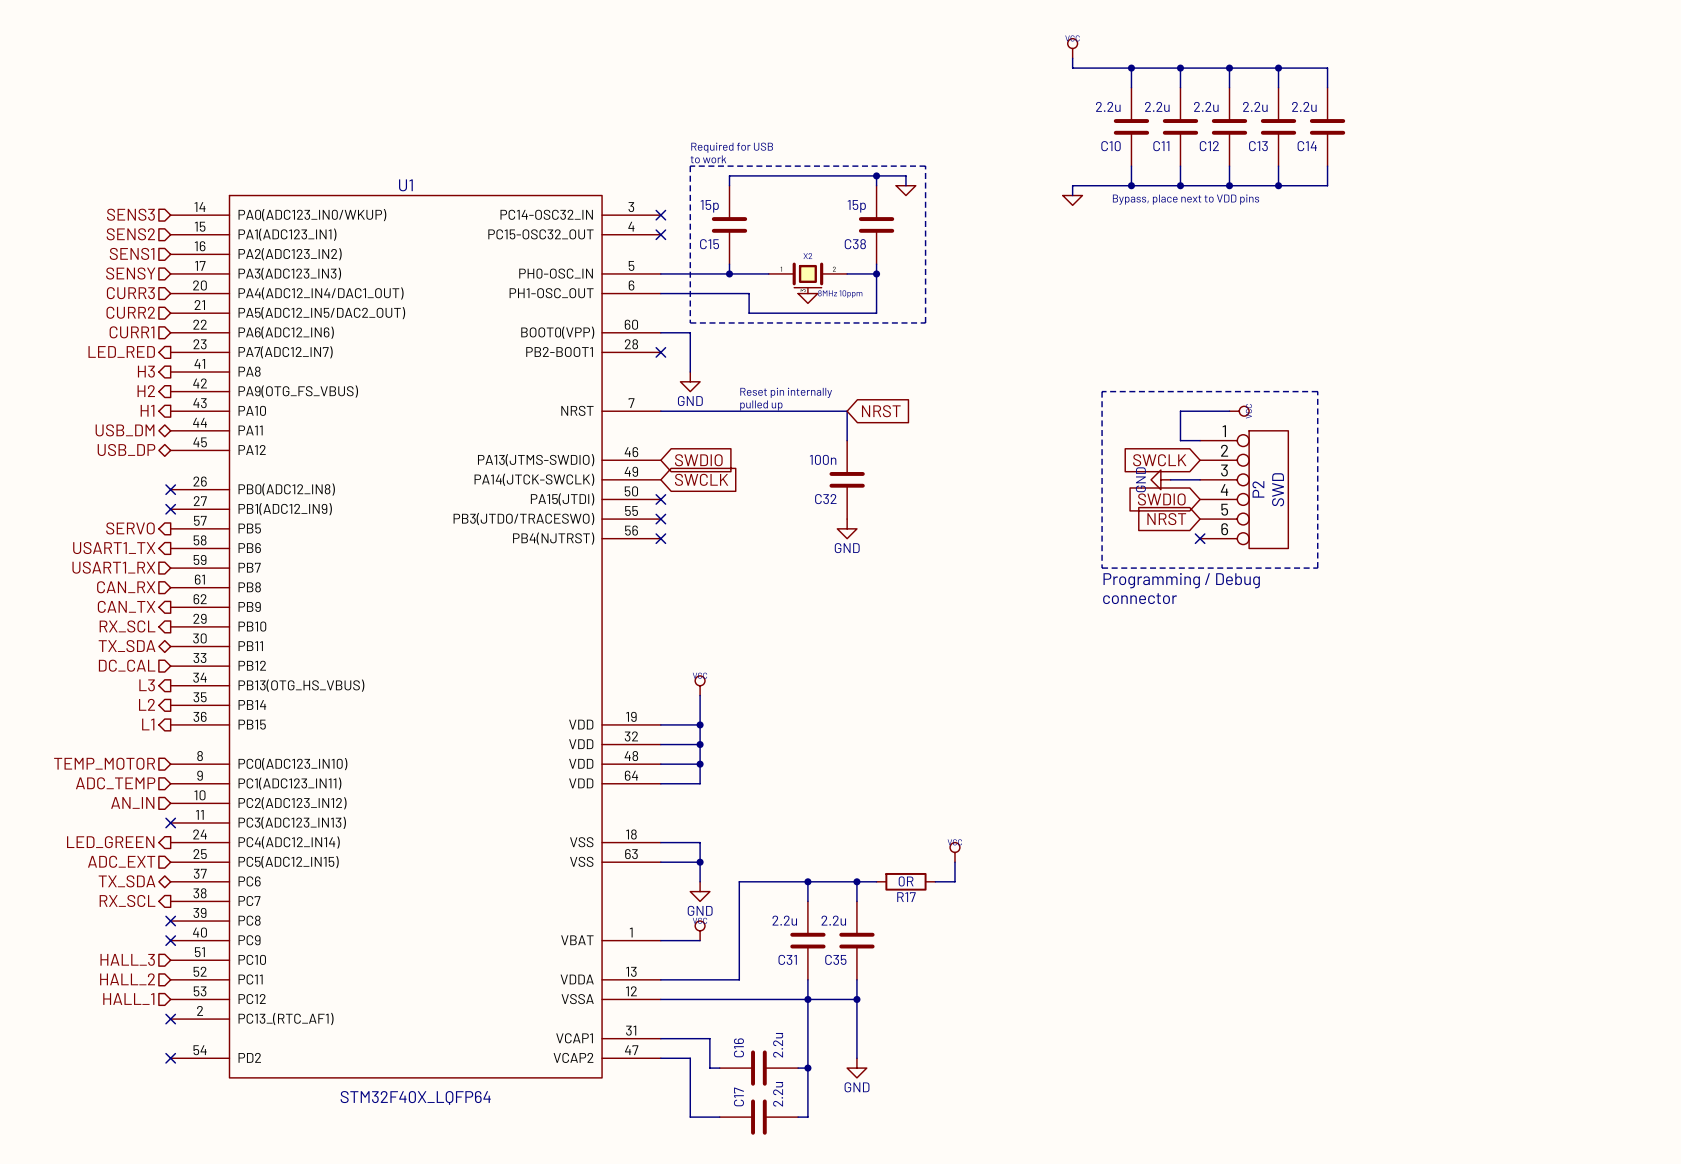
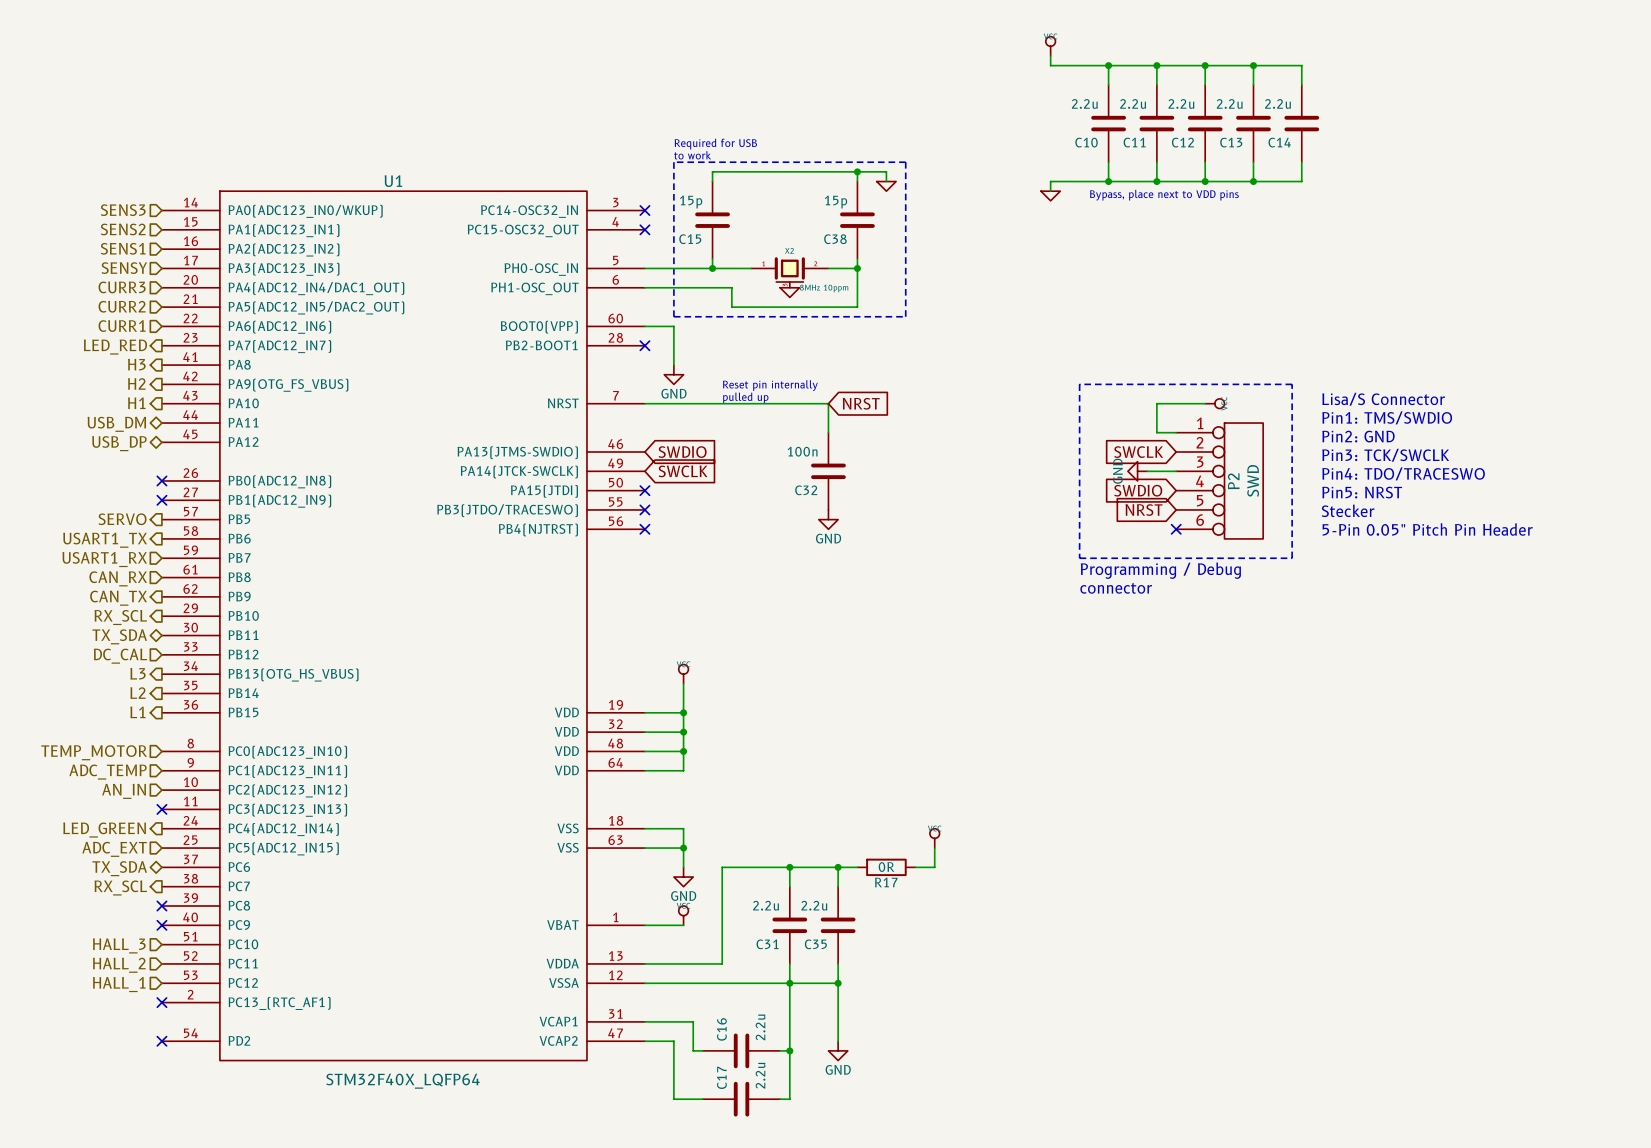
text: none -> Lisa/S Connector (1383, 399)
text: none -> Pin1: TMS/SWDIO (1387, 417)
text: none -> Pin2: GND (1358, 436)
text: none -> Pin3: TCK/SWCLK (1385, 455)
text: none -> Pin4: TDO/TRACESWO (1403, 473)
text: none -> Pin5: NRST (1362, 492)
text: none -> Stecker (1348, 510)
text: none -> 5-Pin 0.05" Pitch Pin Header (1427, 529)

